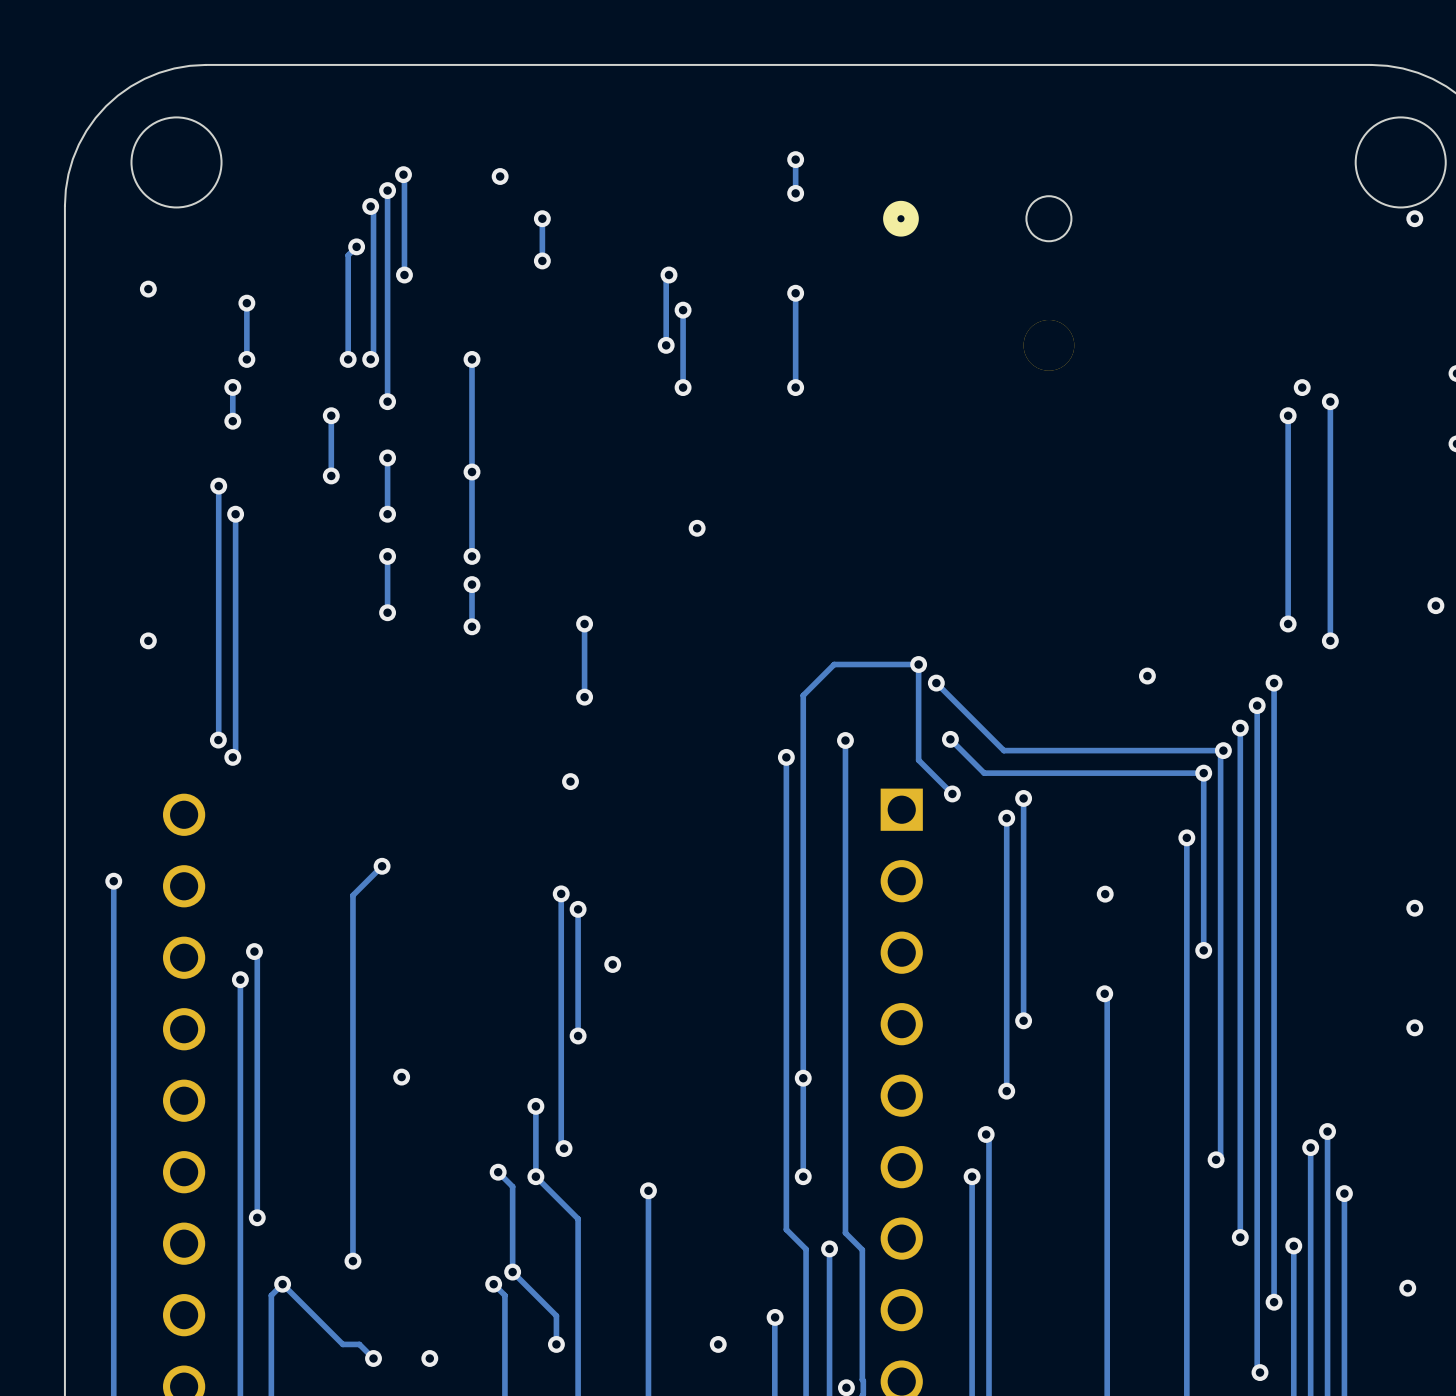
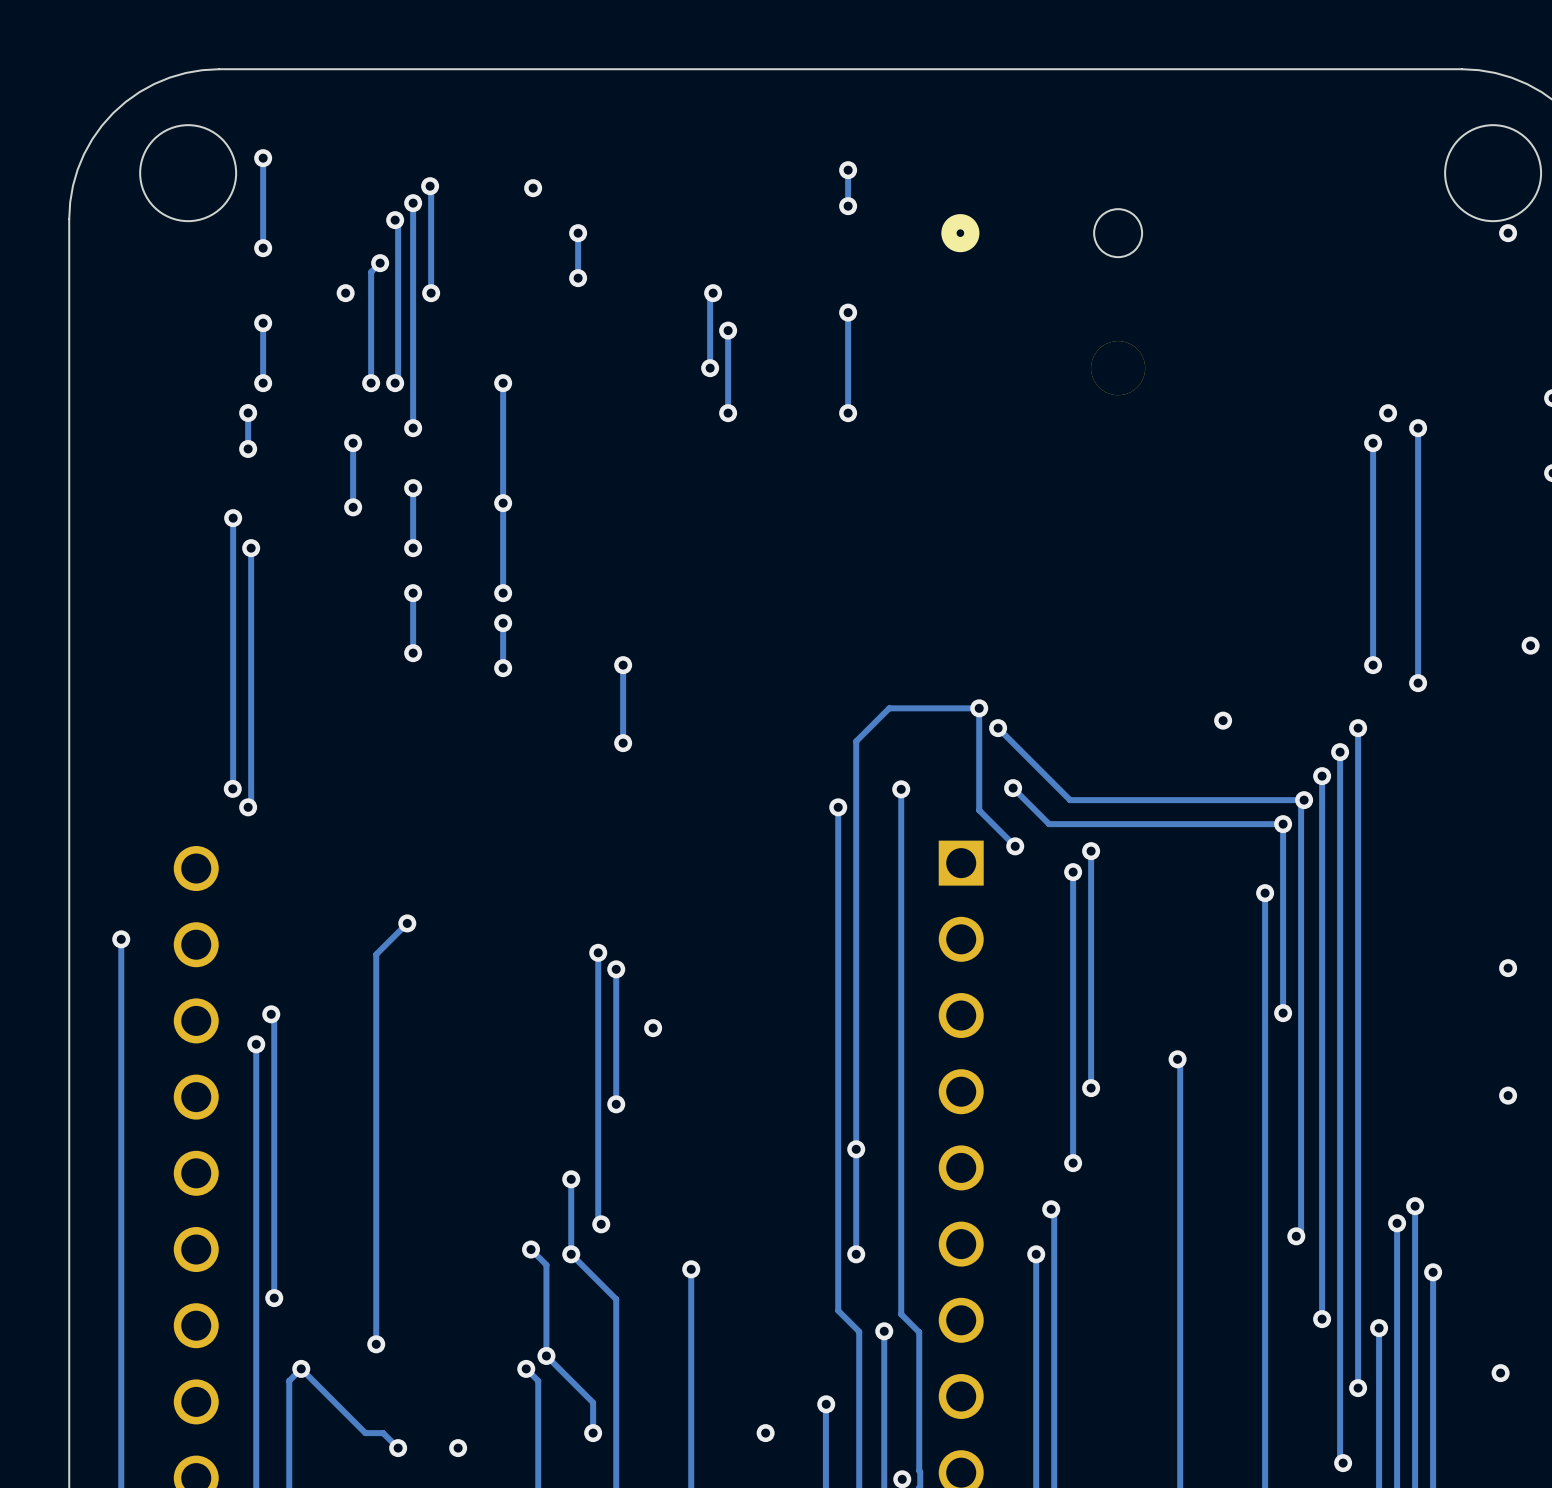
track: none -> (263, 158) (263, 248)
via: none -> (263, 158)
via: none -> (263, 248)
via: none -> (345, 293)
via: (148, 289) -> none
via: (697, 528) -> none
via: (148, 640) -> none
via: (570, 781) -> none
via: (1105, 894) -> none
via: (401, 1077) -> none

